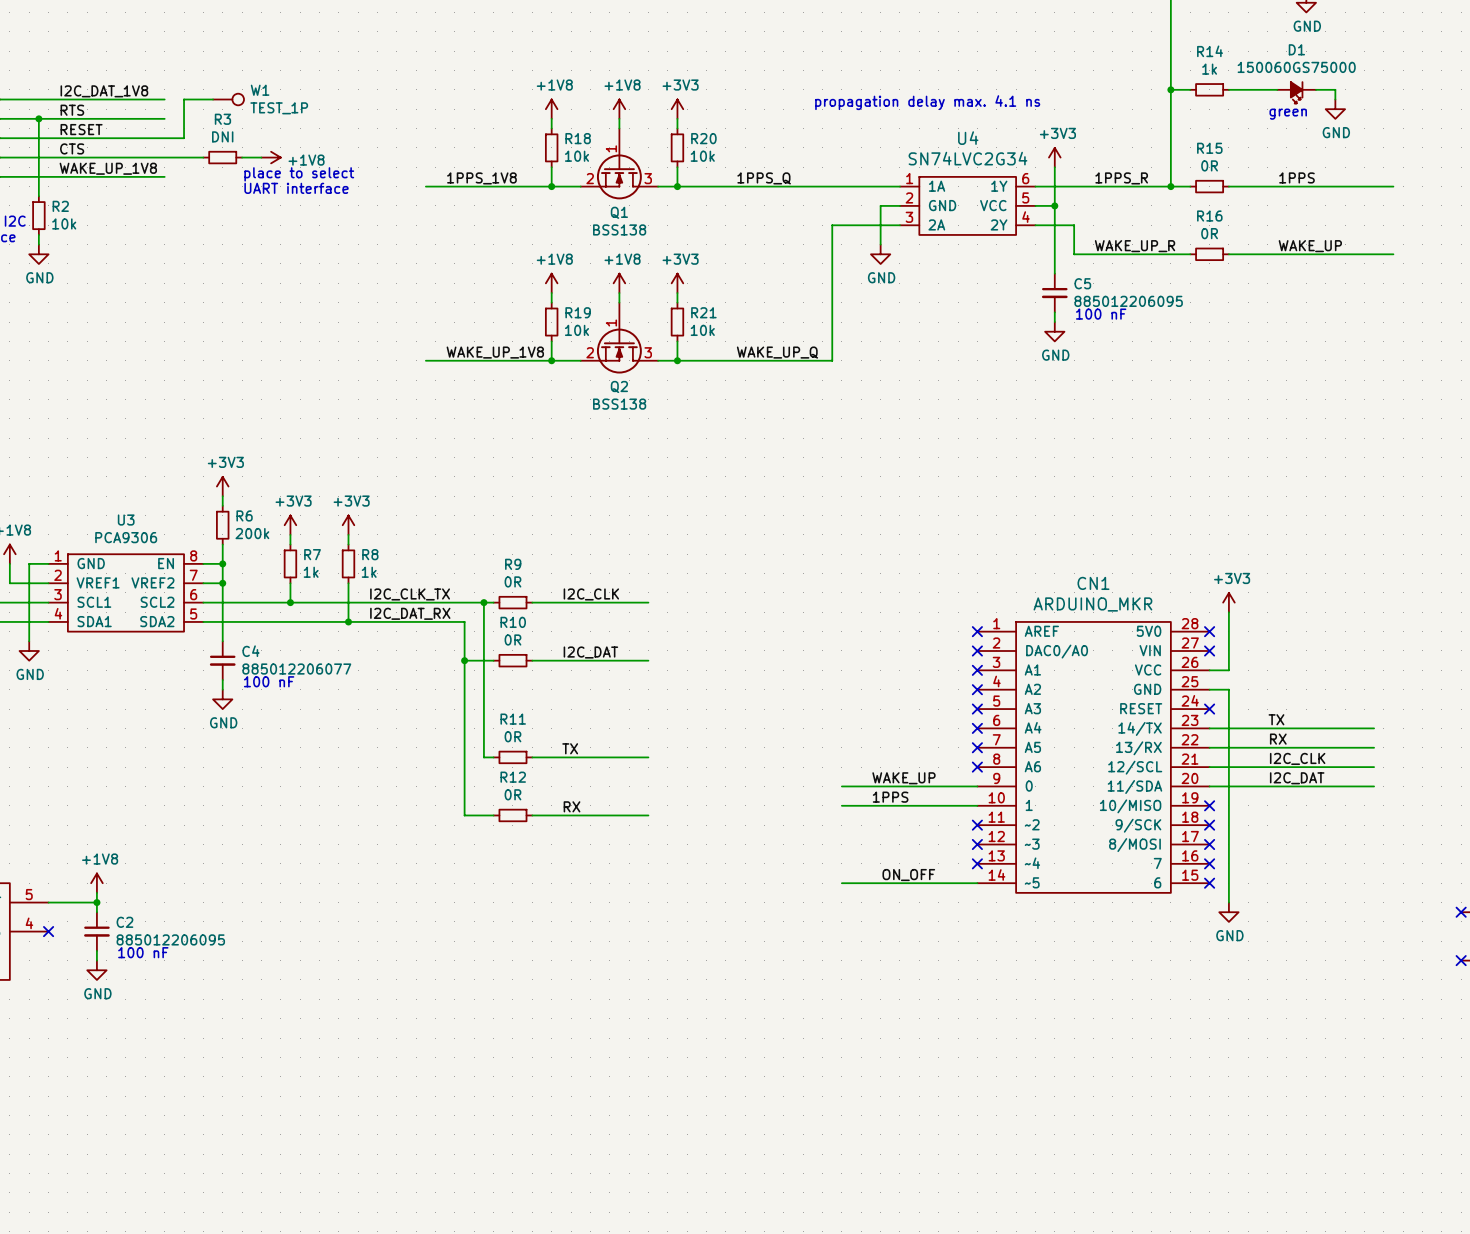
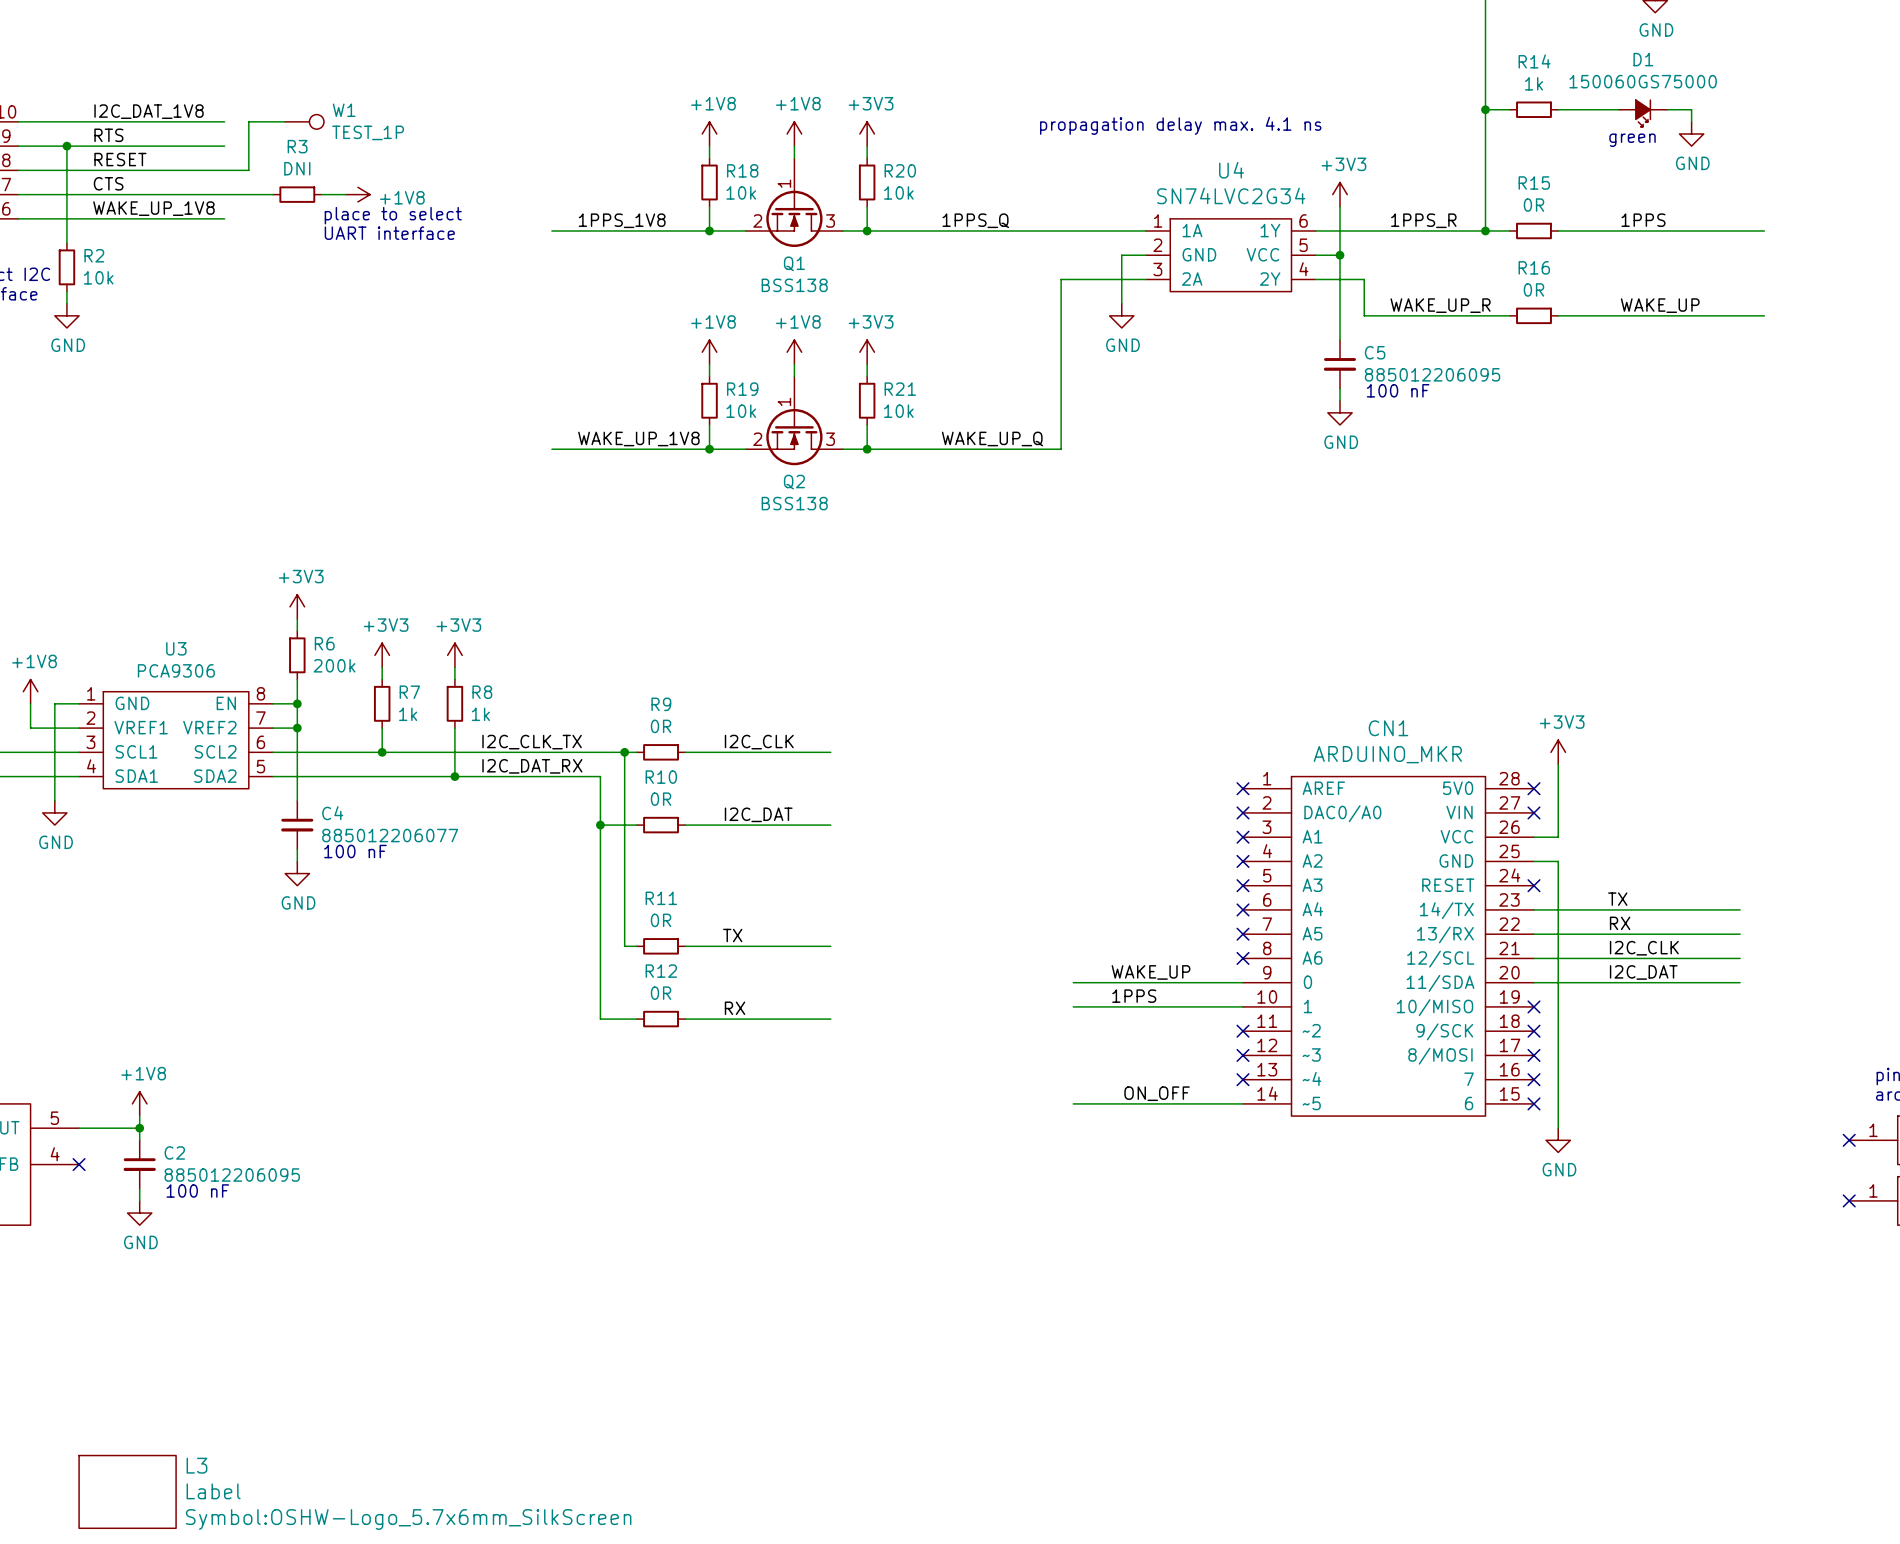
L3: none -> Label (127, 1491)

